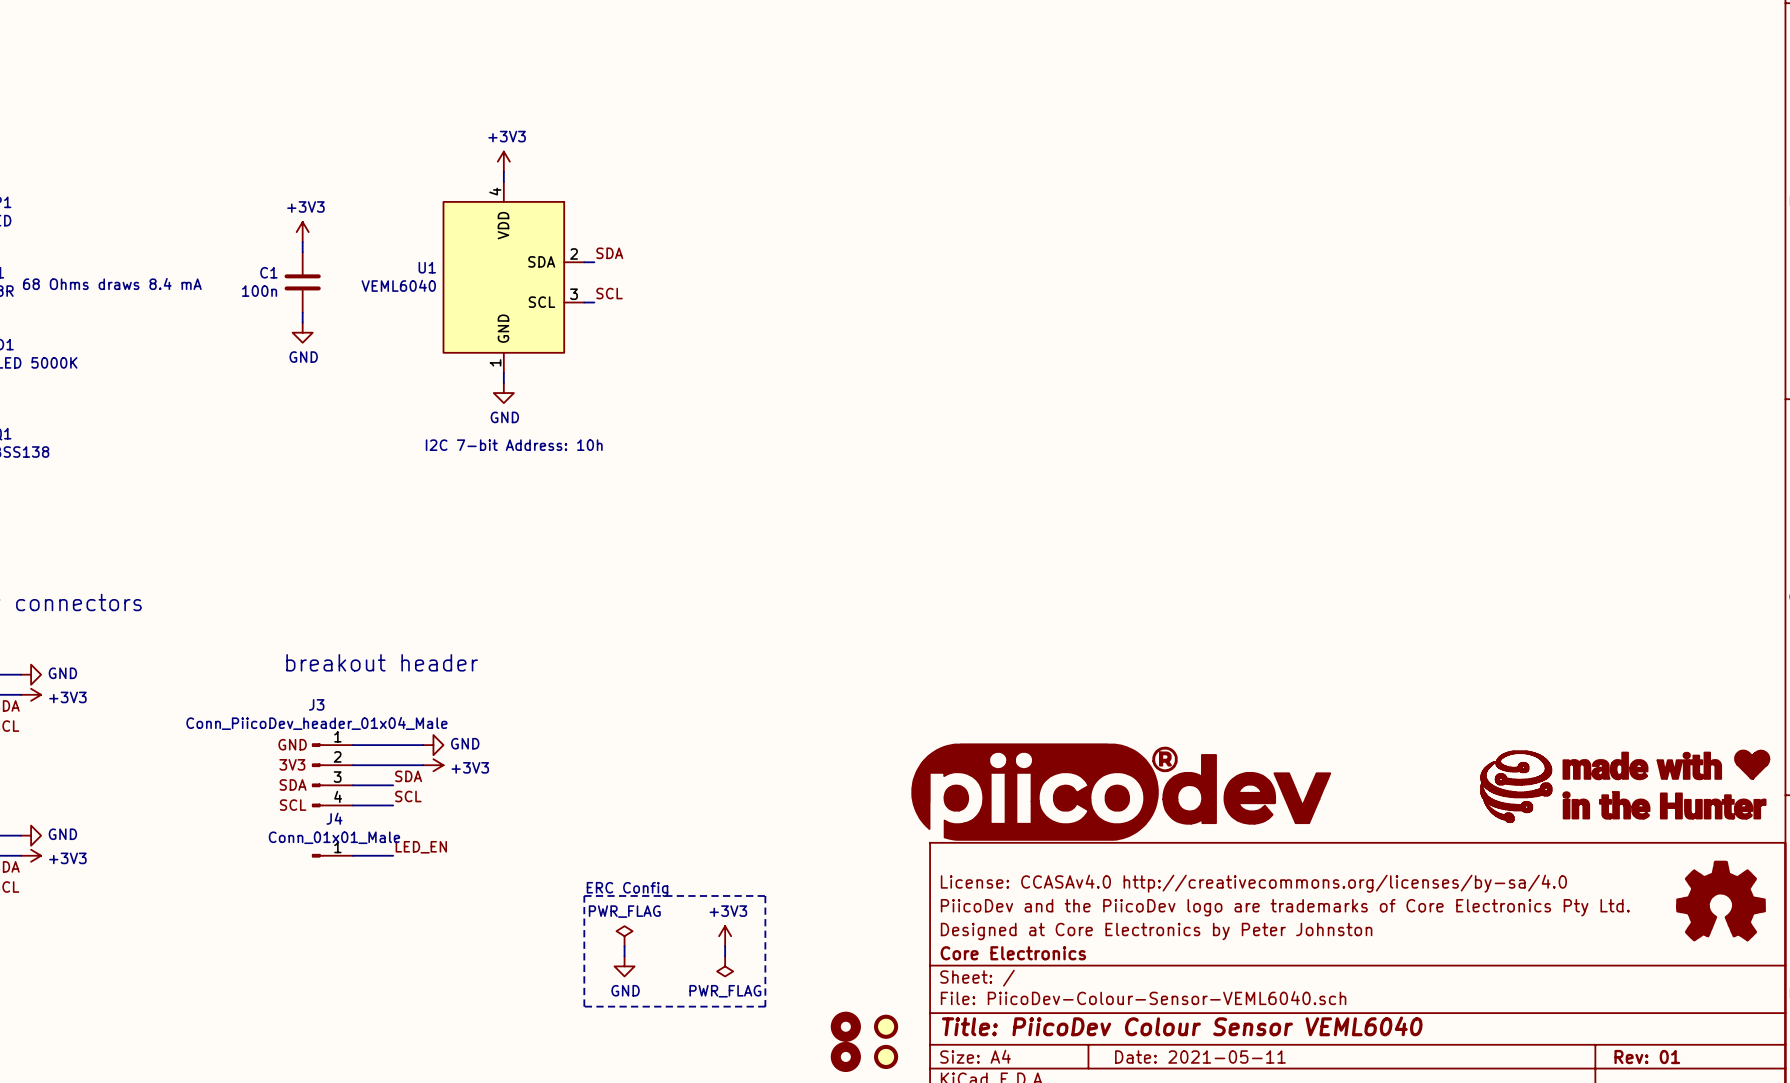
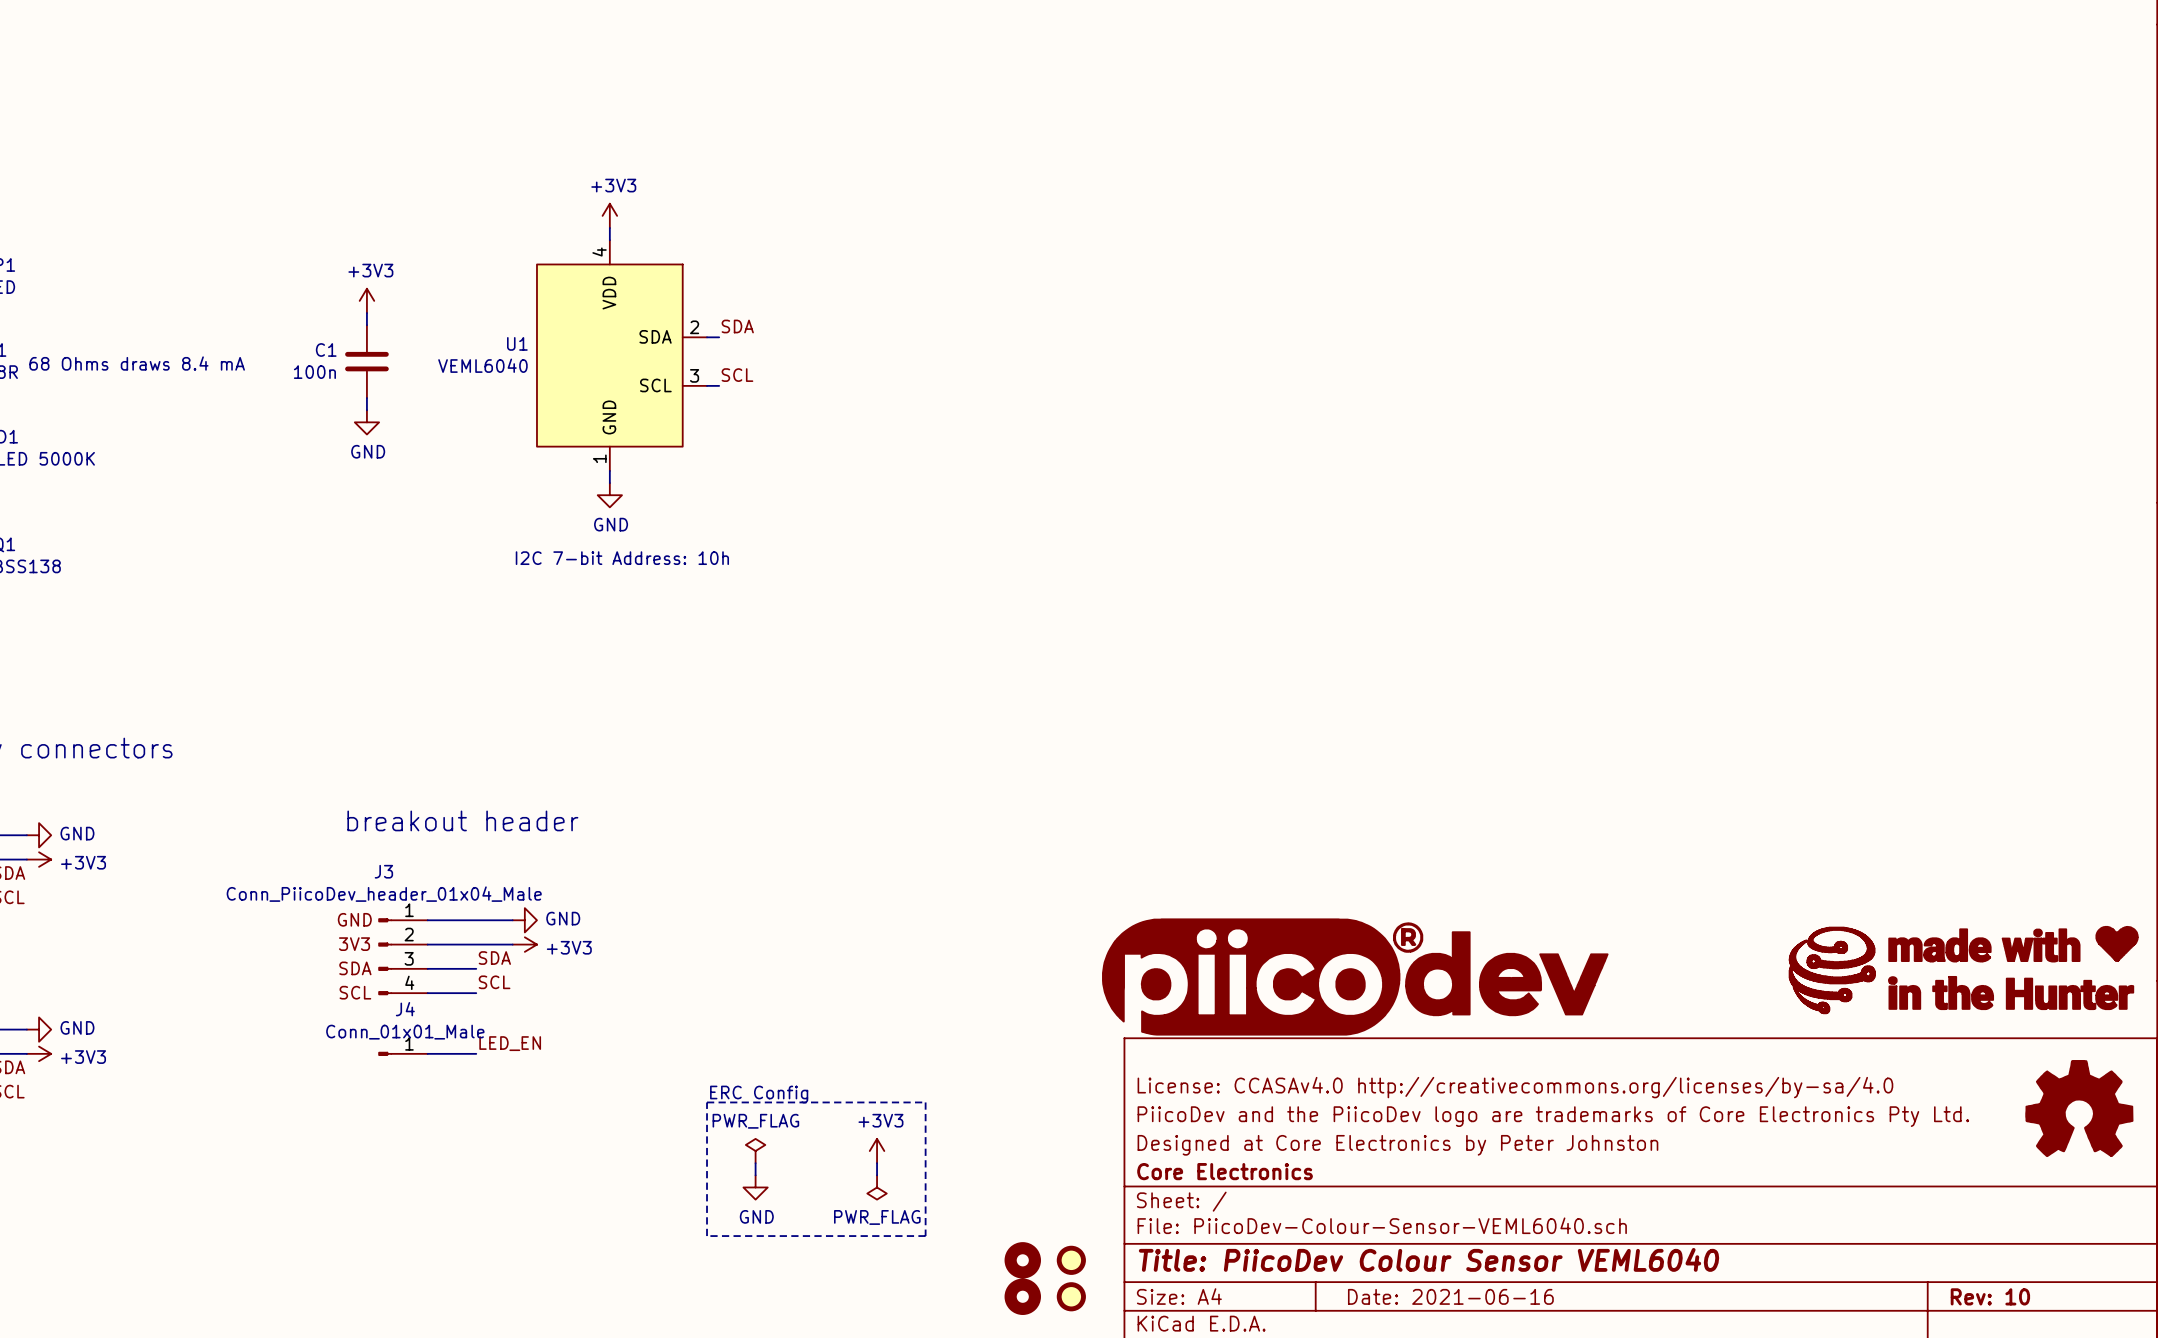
title block: Date: 2021-05-11 (1200, 1057) -> Date: 2021-06-16 (1450, 1296)
title block: Rev: 01 (1647, 1057) -> Rev: 10 (1990, 1296)

